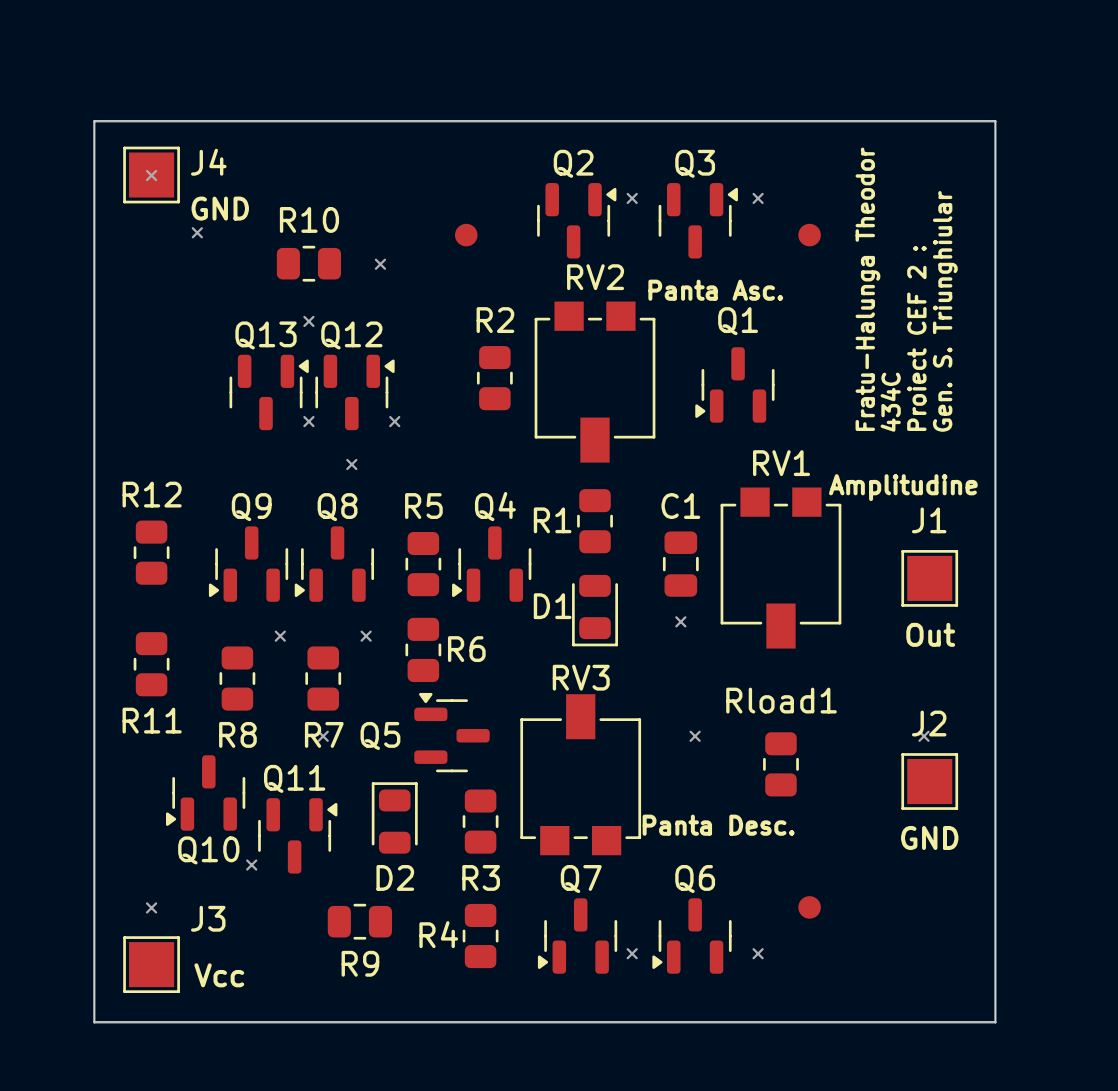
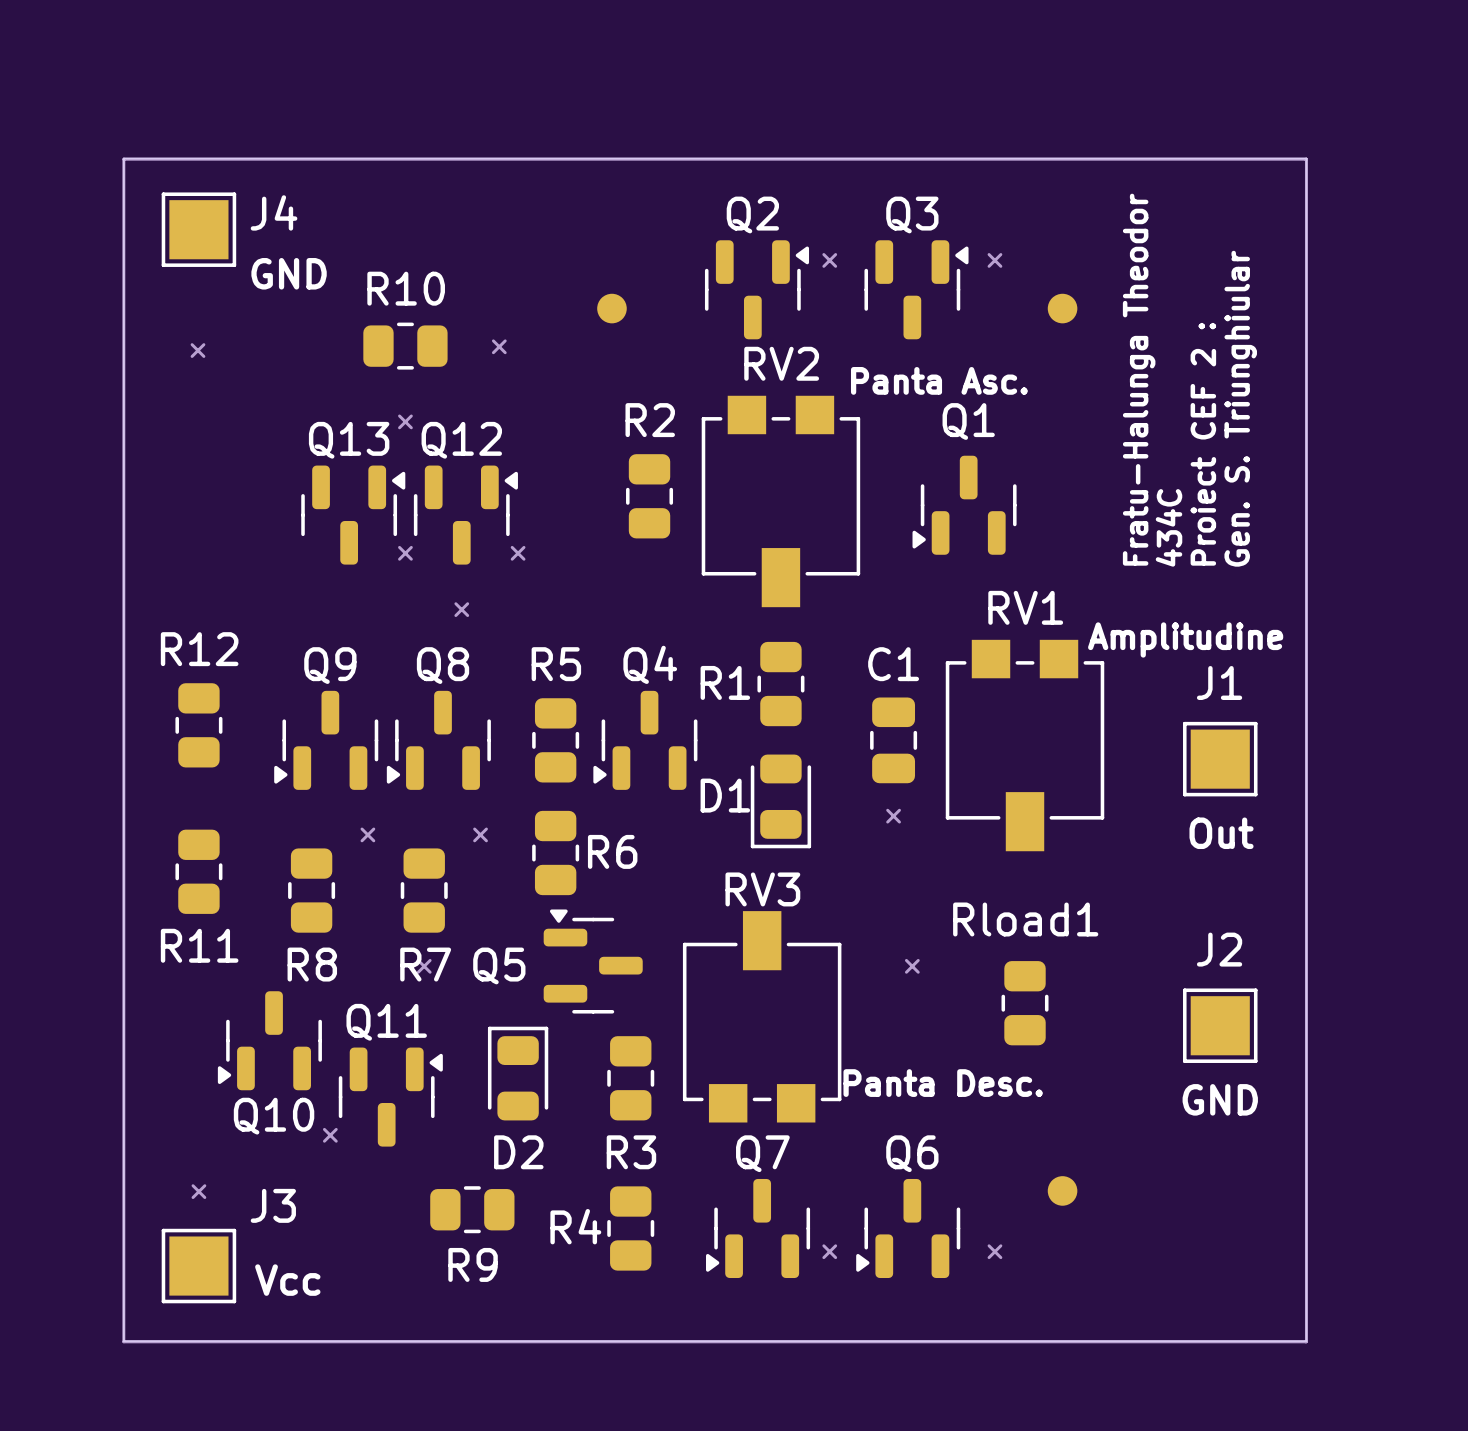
line: (147, 171) (156, 180) -> none
line: (156, 171) (147, 180) -> none
line: (192, 228) (201, 237) -> (192, 344) (203, 356)
line: (201, 228) (192, 237) -> (203, 344) (192, 356)
line: (919, 731) (928, 740) -> none
line: (928, 731) (919, 740) -> none

